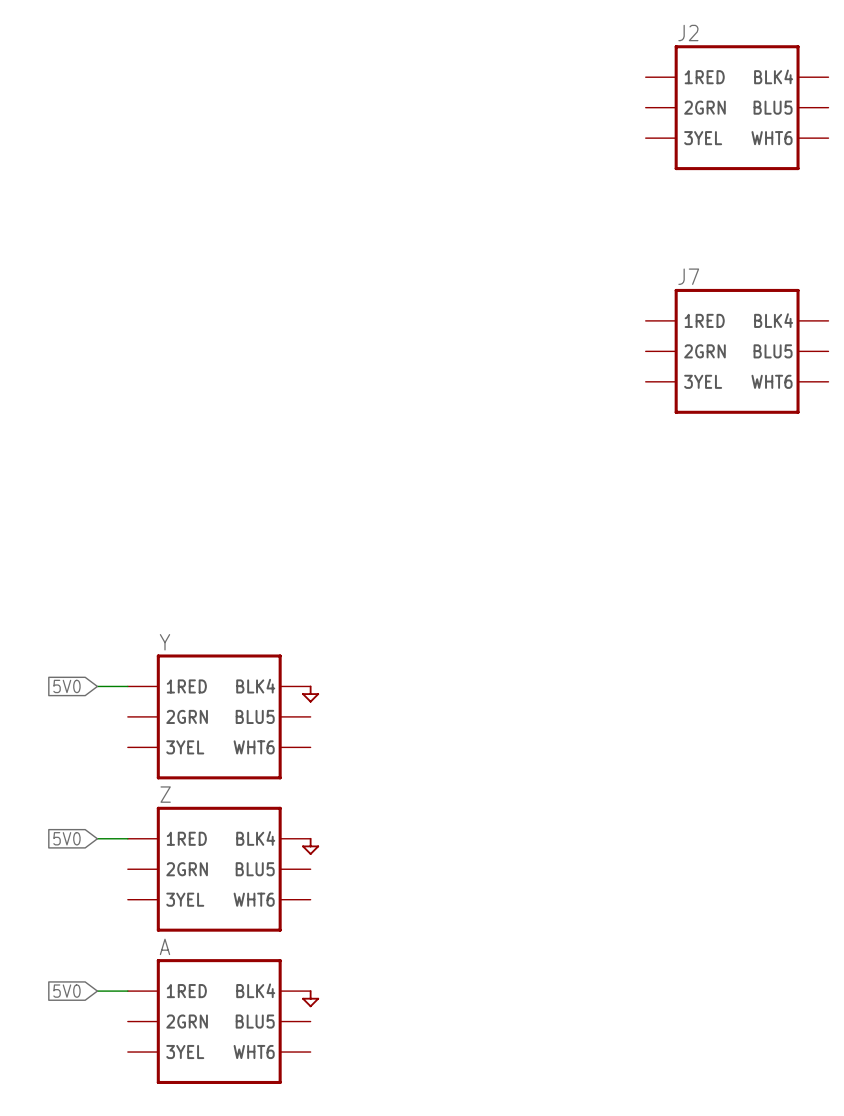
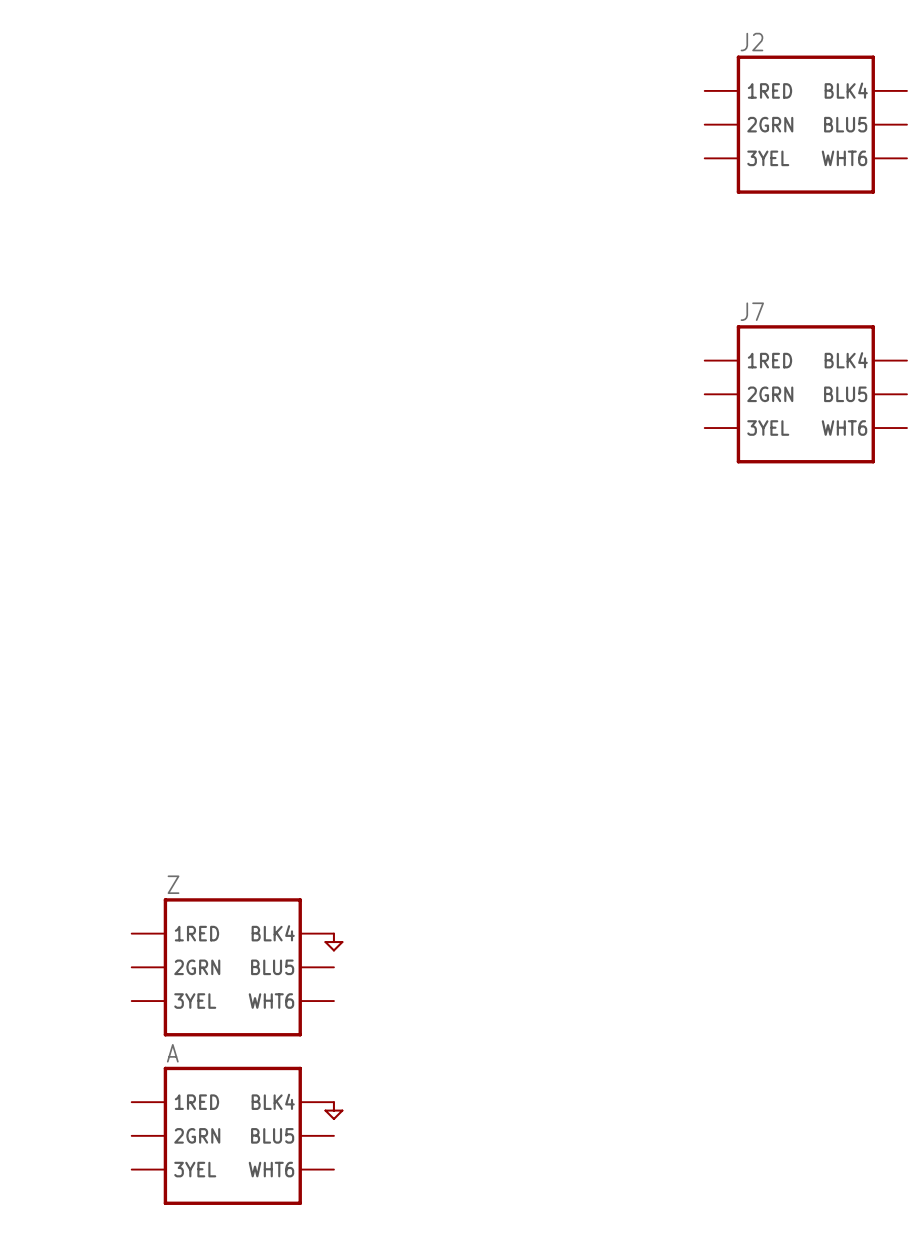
global label: 5V0 (66, 686) -> none
wire: (97, 686) (127, 686) -> none
power symbol: (310, 694) -> none
Y: (219, 716) -> none
global label: 5V0 (66, 838) -> none
wire: (97, 838) (127, 838) -> none
global label: 5V0 (66, 991) -> none
wire: (97, 991) (127, 991) -> none

